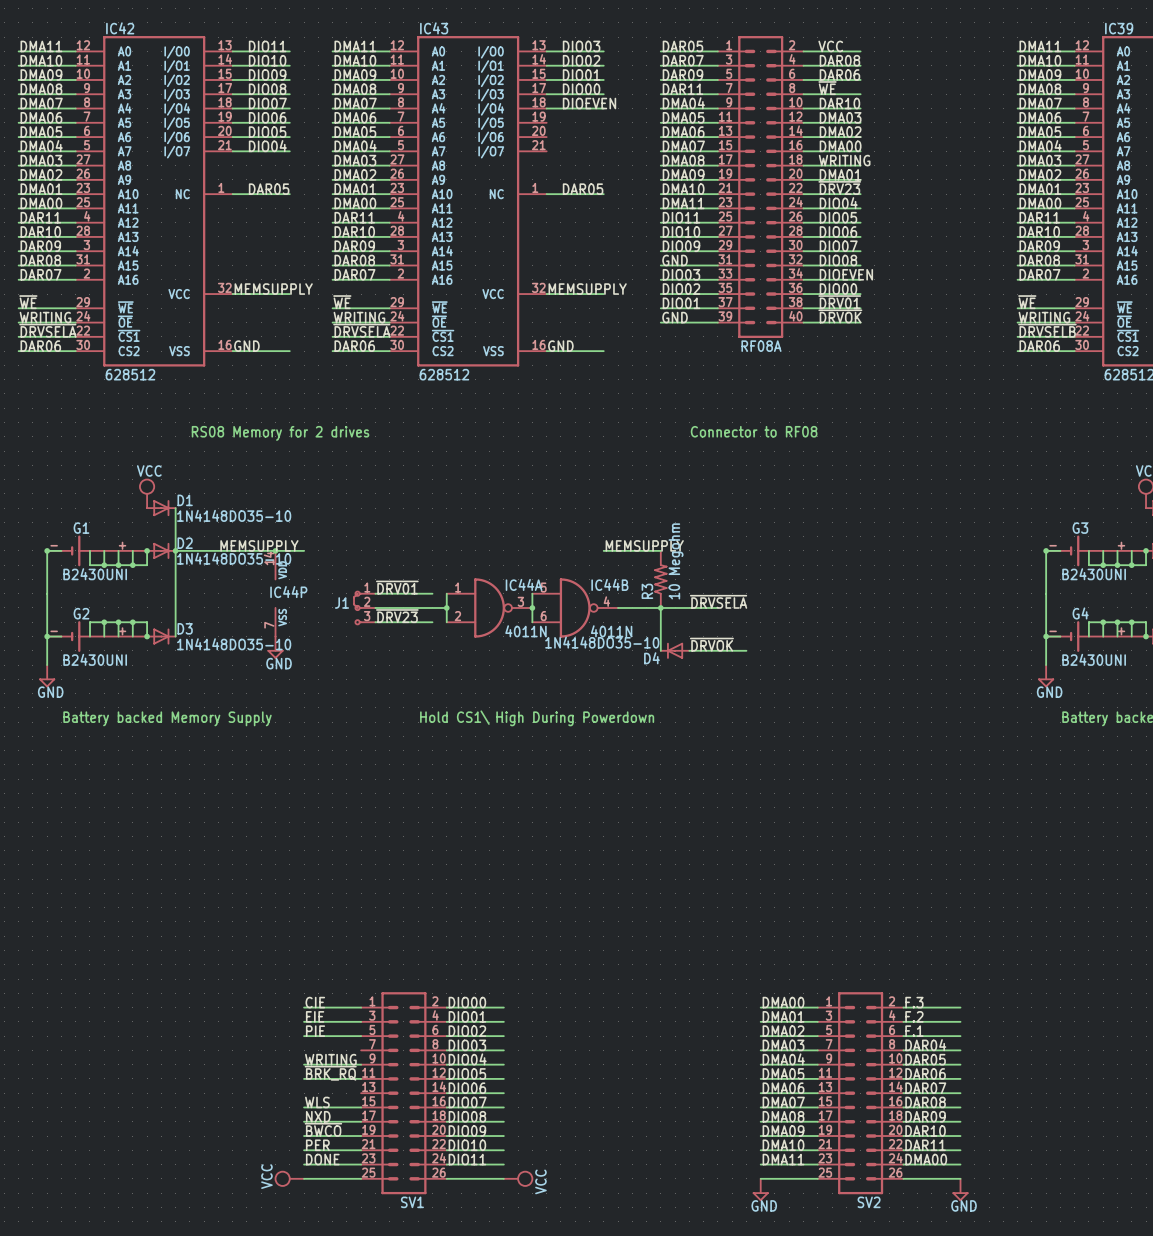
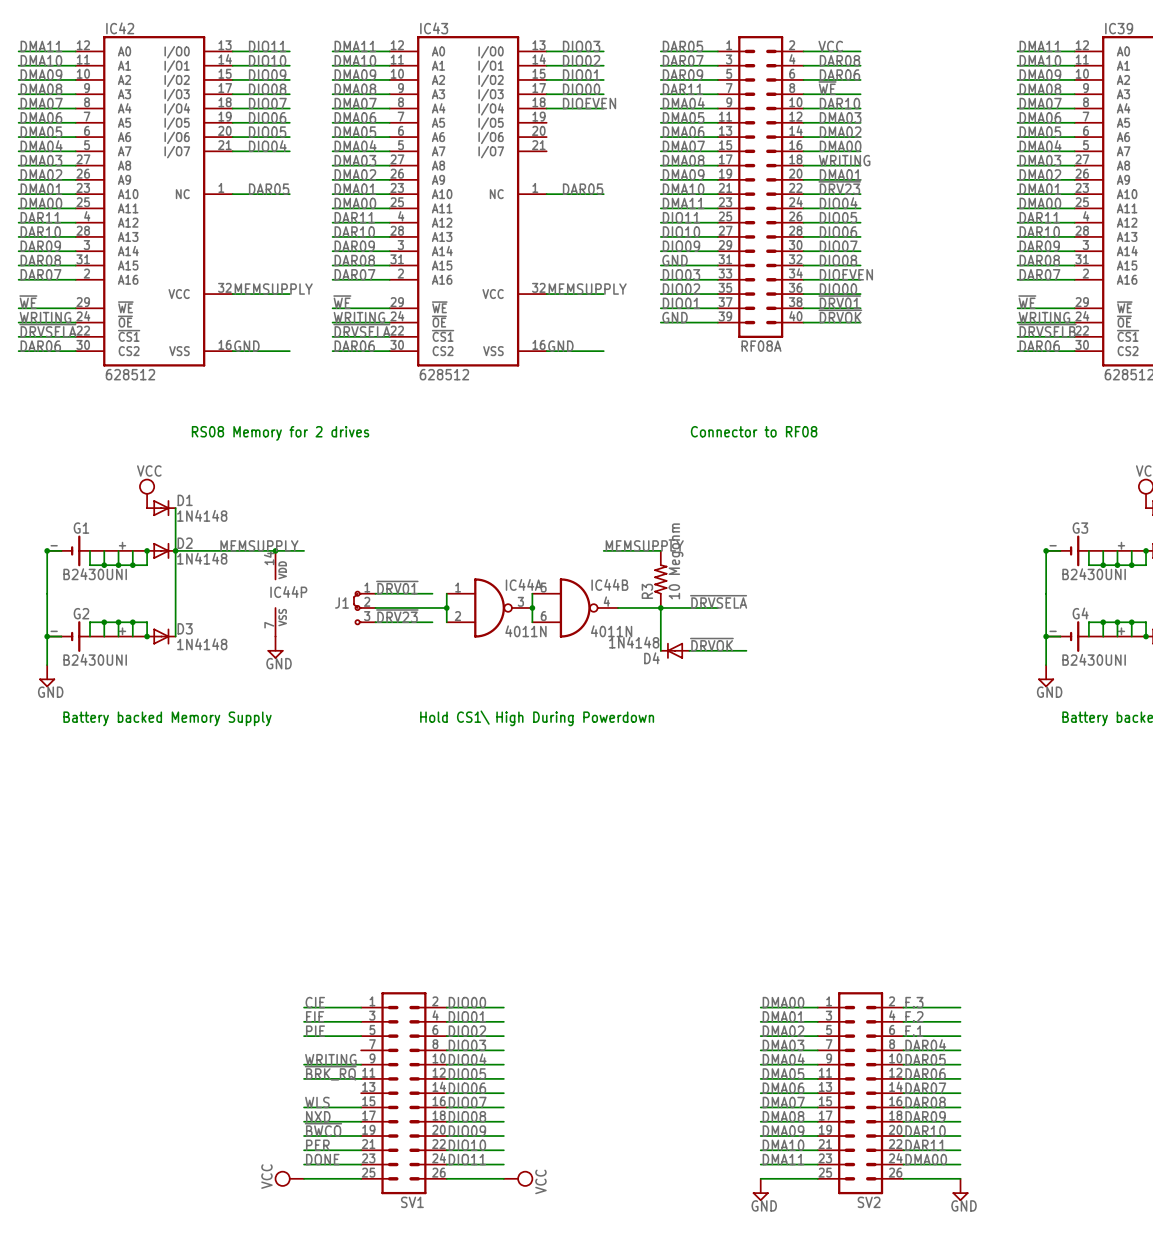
D1 value: 1N4148DO35-10 (234, 515) -> 1N4148 (202, 515)
D2 value: 1N4148DO35-10 (234, 558) -> 1N4148 (202, 558)
D4 value: 1N4148DO35-10 (602, 642) -> 1N4148 (634, 642)
D3 value: 1N4148DO35-10 (234, 644) -> 1N4148 (202, 644)

